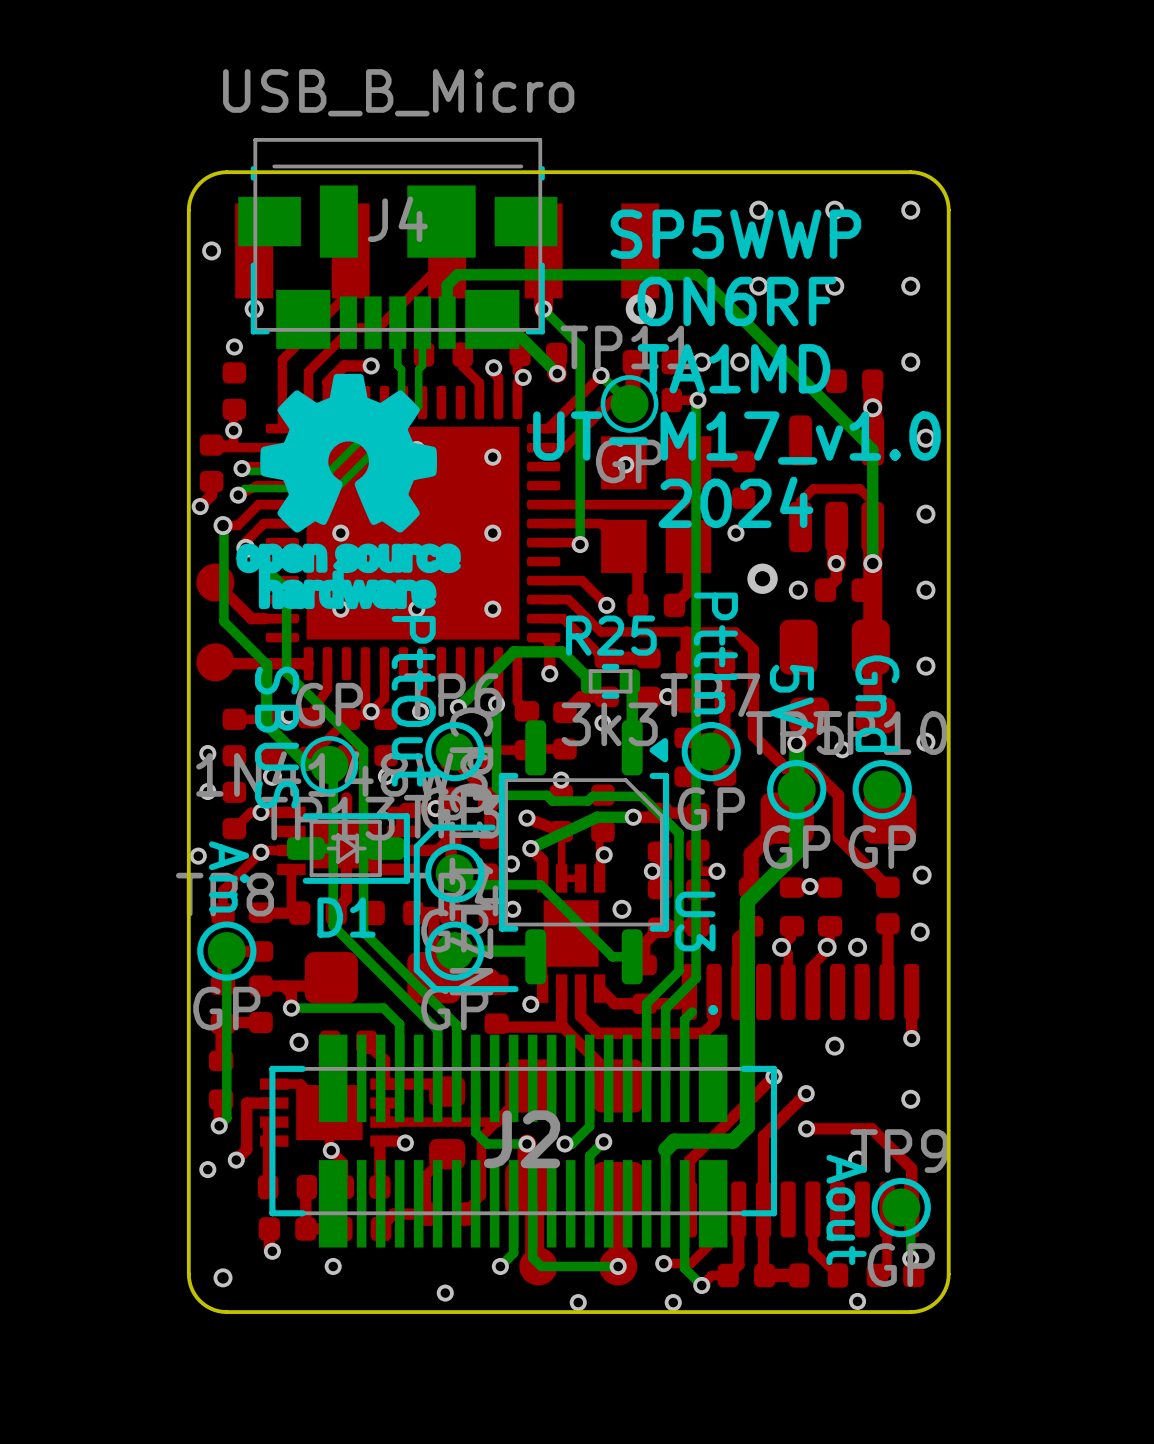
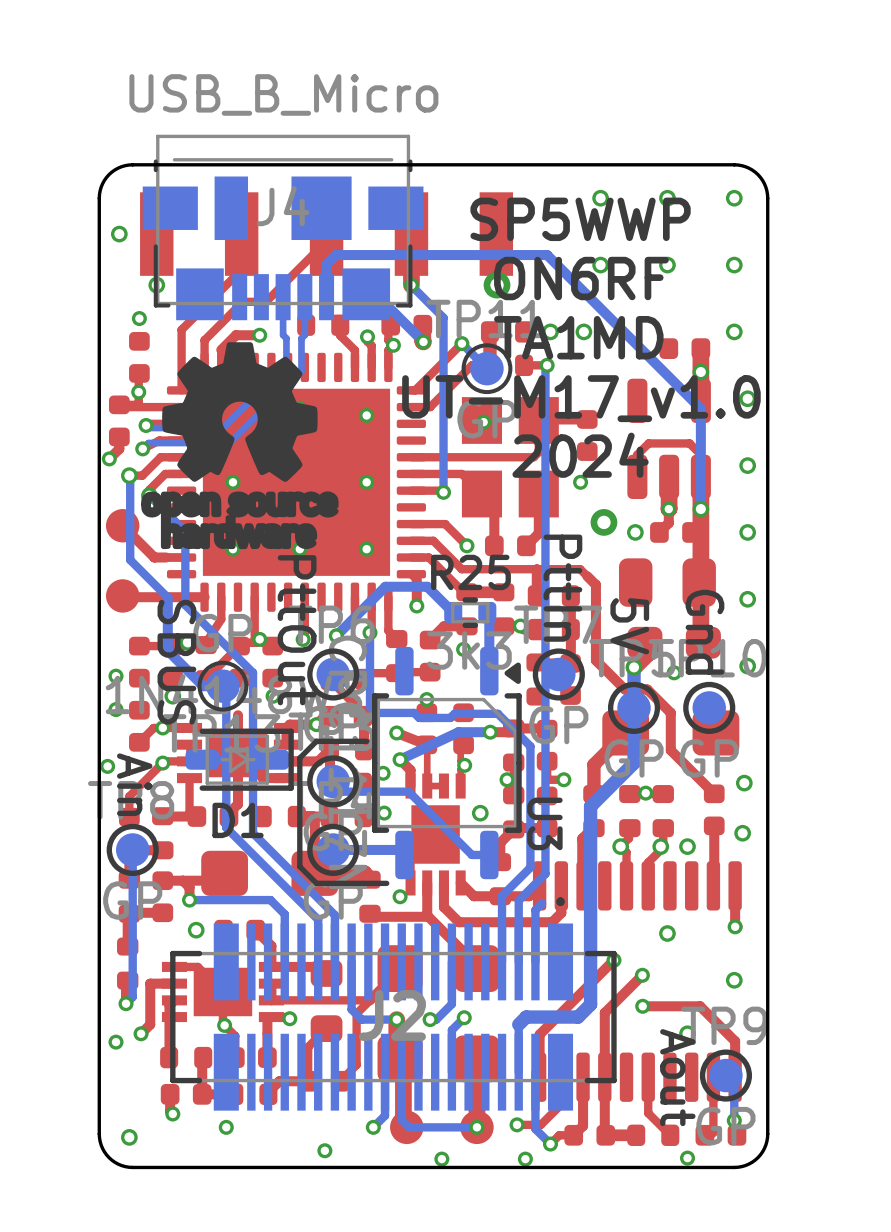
top track: (384, 663) (384, 698) (371, 711) -> none

